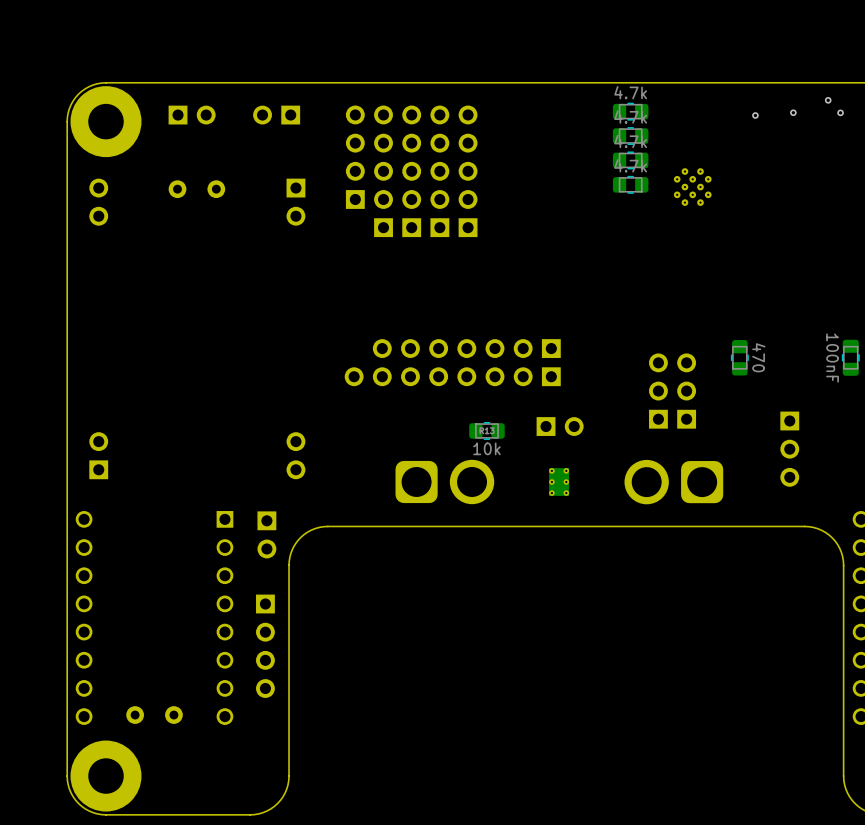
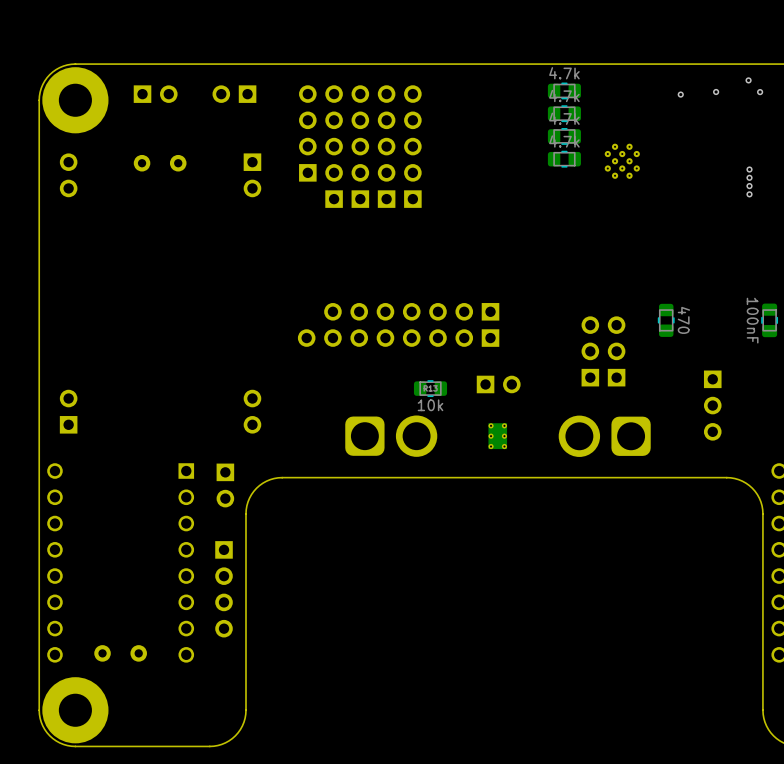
via: none -> (749, 169)
via: none -> (749, 177)
via: none -> (749, 186)
via: none -> (749, 194)

